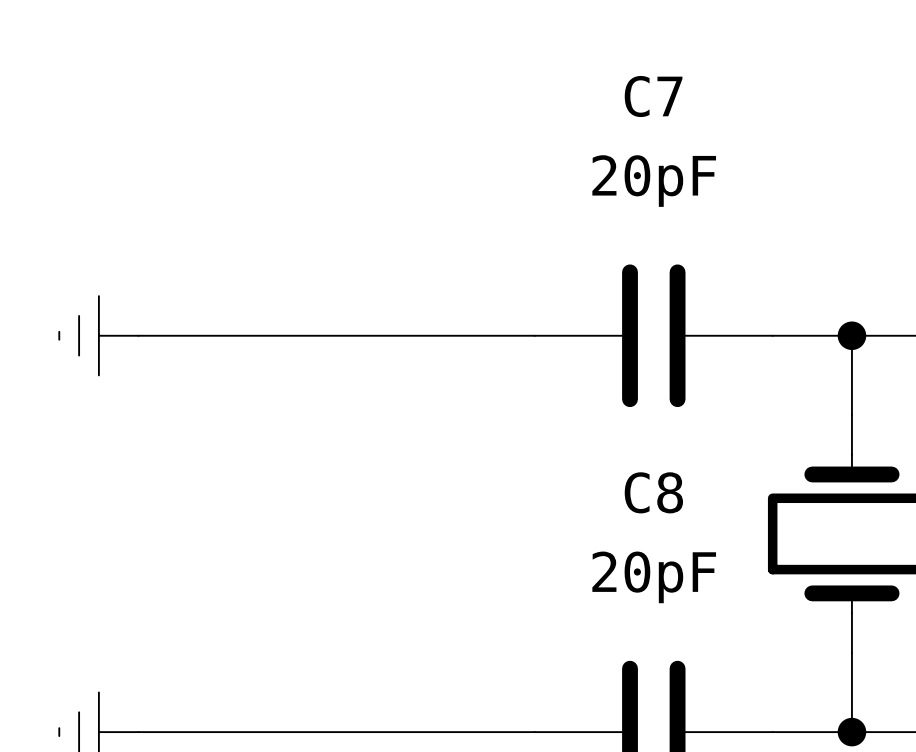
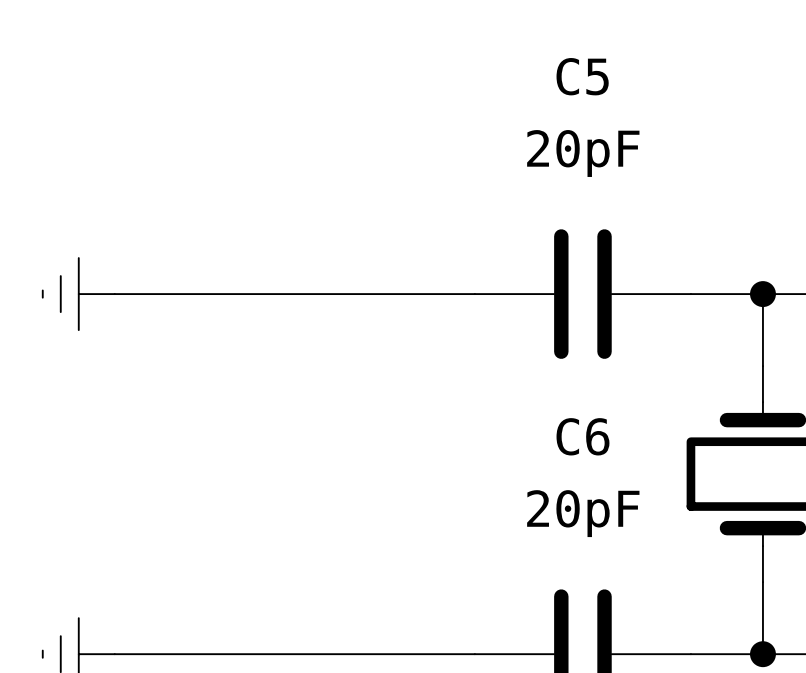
C7 name: C7 (653, 96) -> C5 (582, 76)
C8 name: C8 (653, 492) -> C6 (582, 436)

